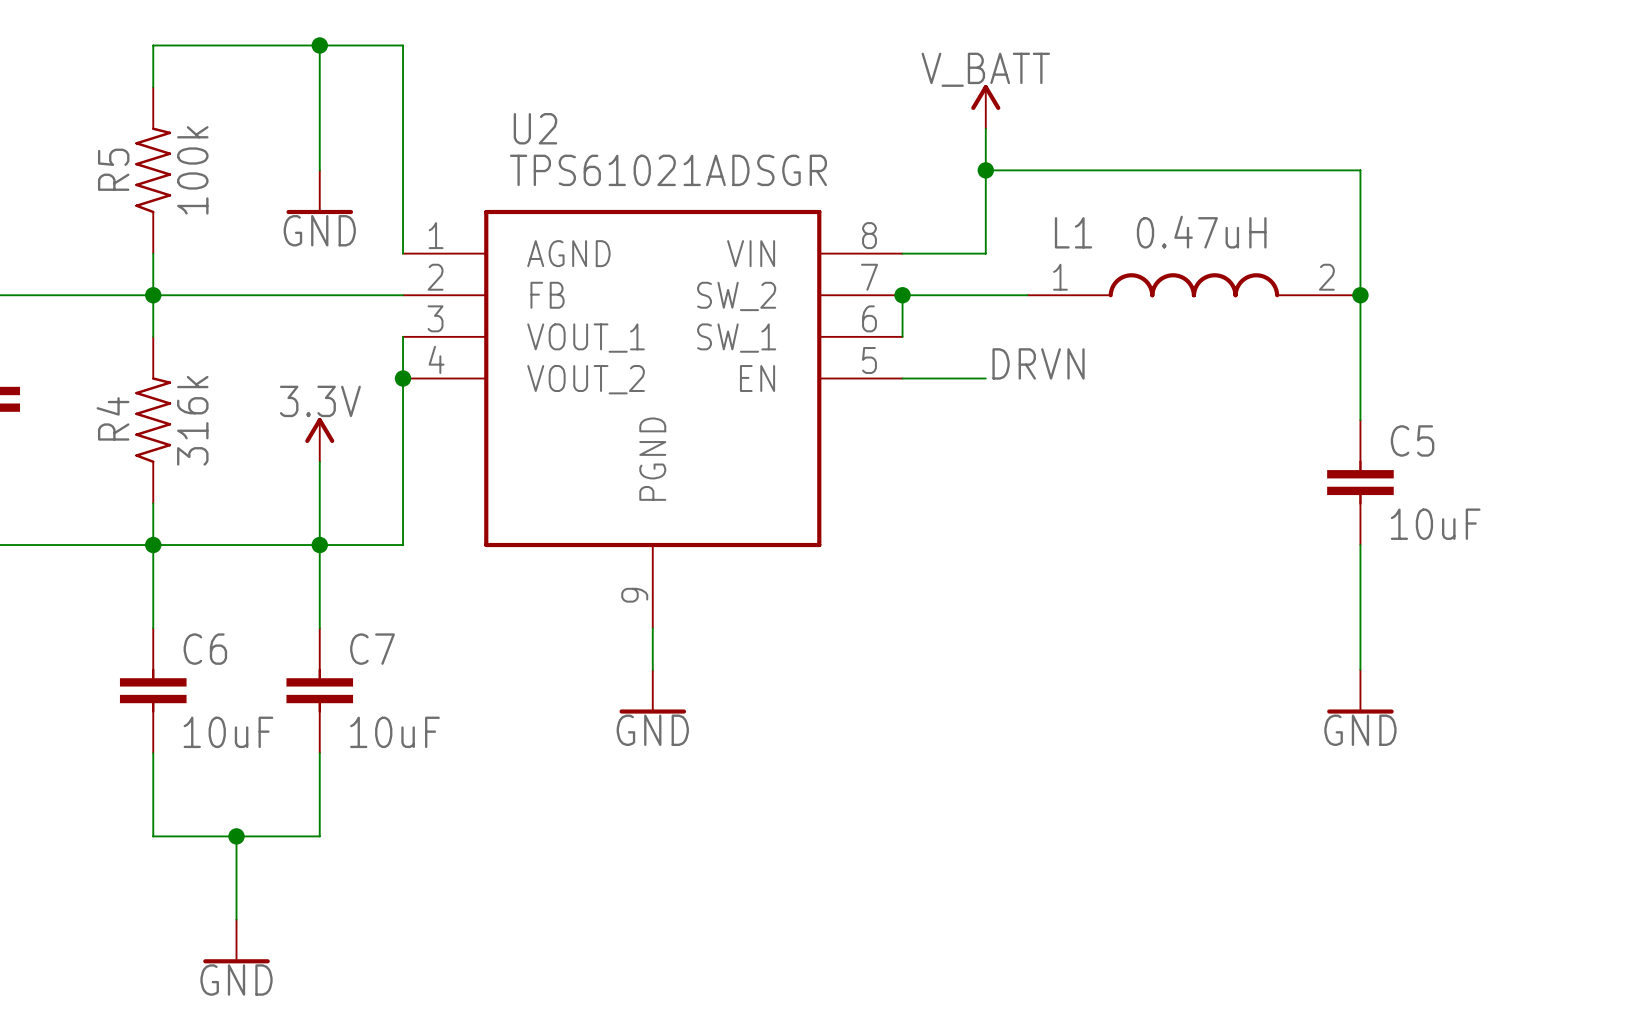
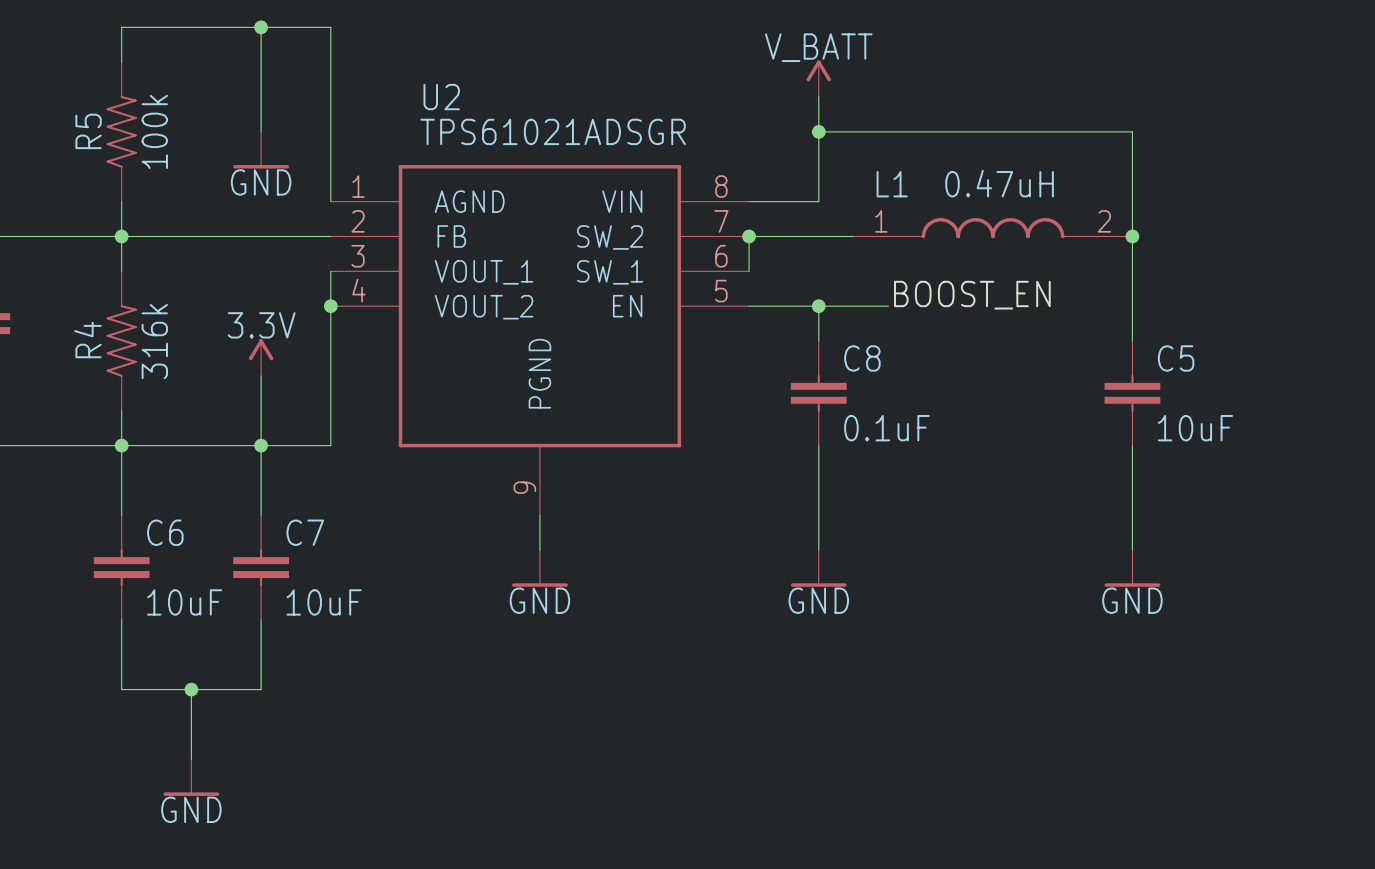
label: DRVN (1038, 363) -> none
label: none -> BOOST_EN (972, 295)
junction: none -> (818, 306)
wire: none -> (888, 306) (818, 306) (818, 341)
C8: none -> 0.1uF (818, 393)
wire: none -> (818, 445) (818, 550)
power symbol: none -> GND (818, 568)

